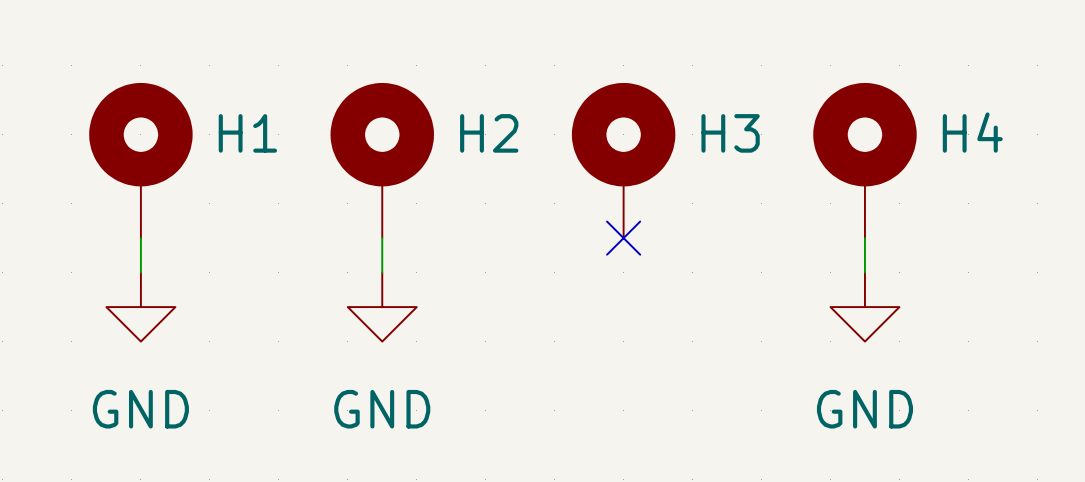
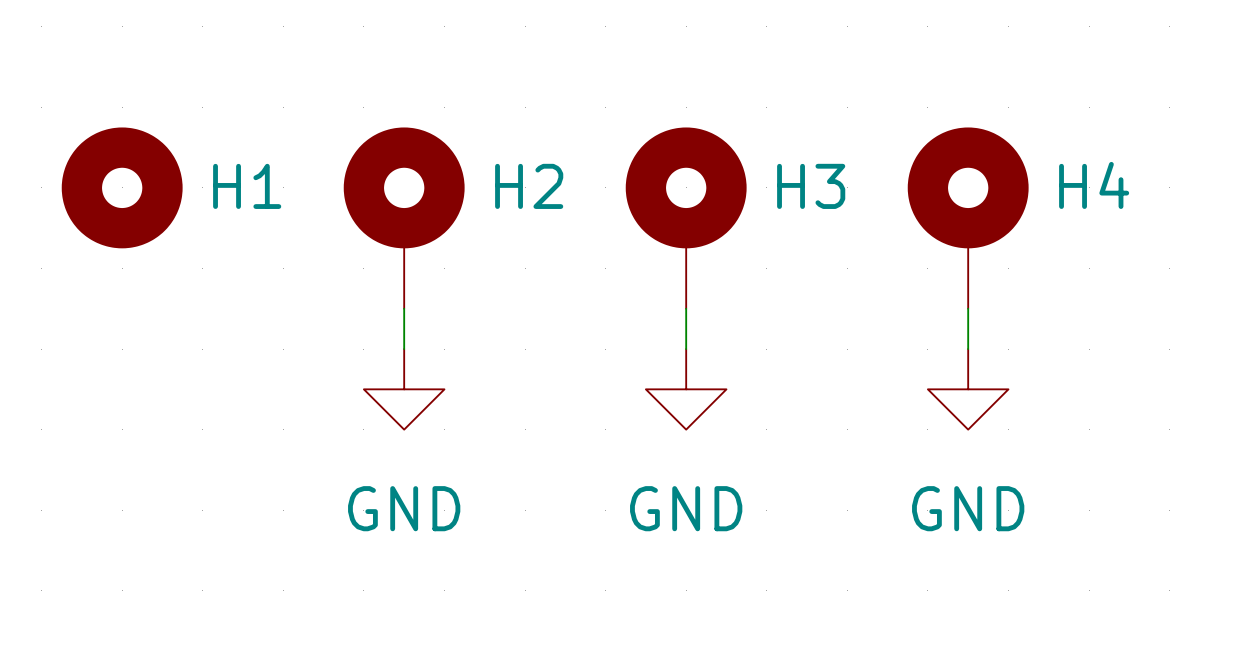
H1 symbol: [89, 82, 193, 239] -> [61, 127, 183, 249]
wire: (140, 238) (140, 272) -> (686, 308) (686, 349)
no-connect mark: (623, 238) -> none
power symbol position: GND (140, 307) -> GND (686, 389)

